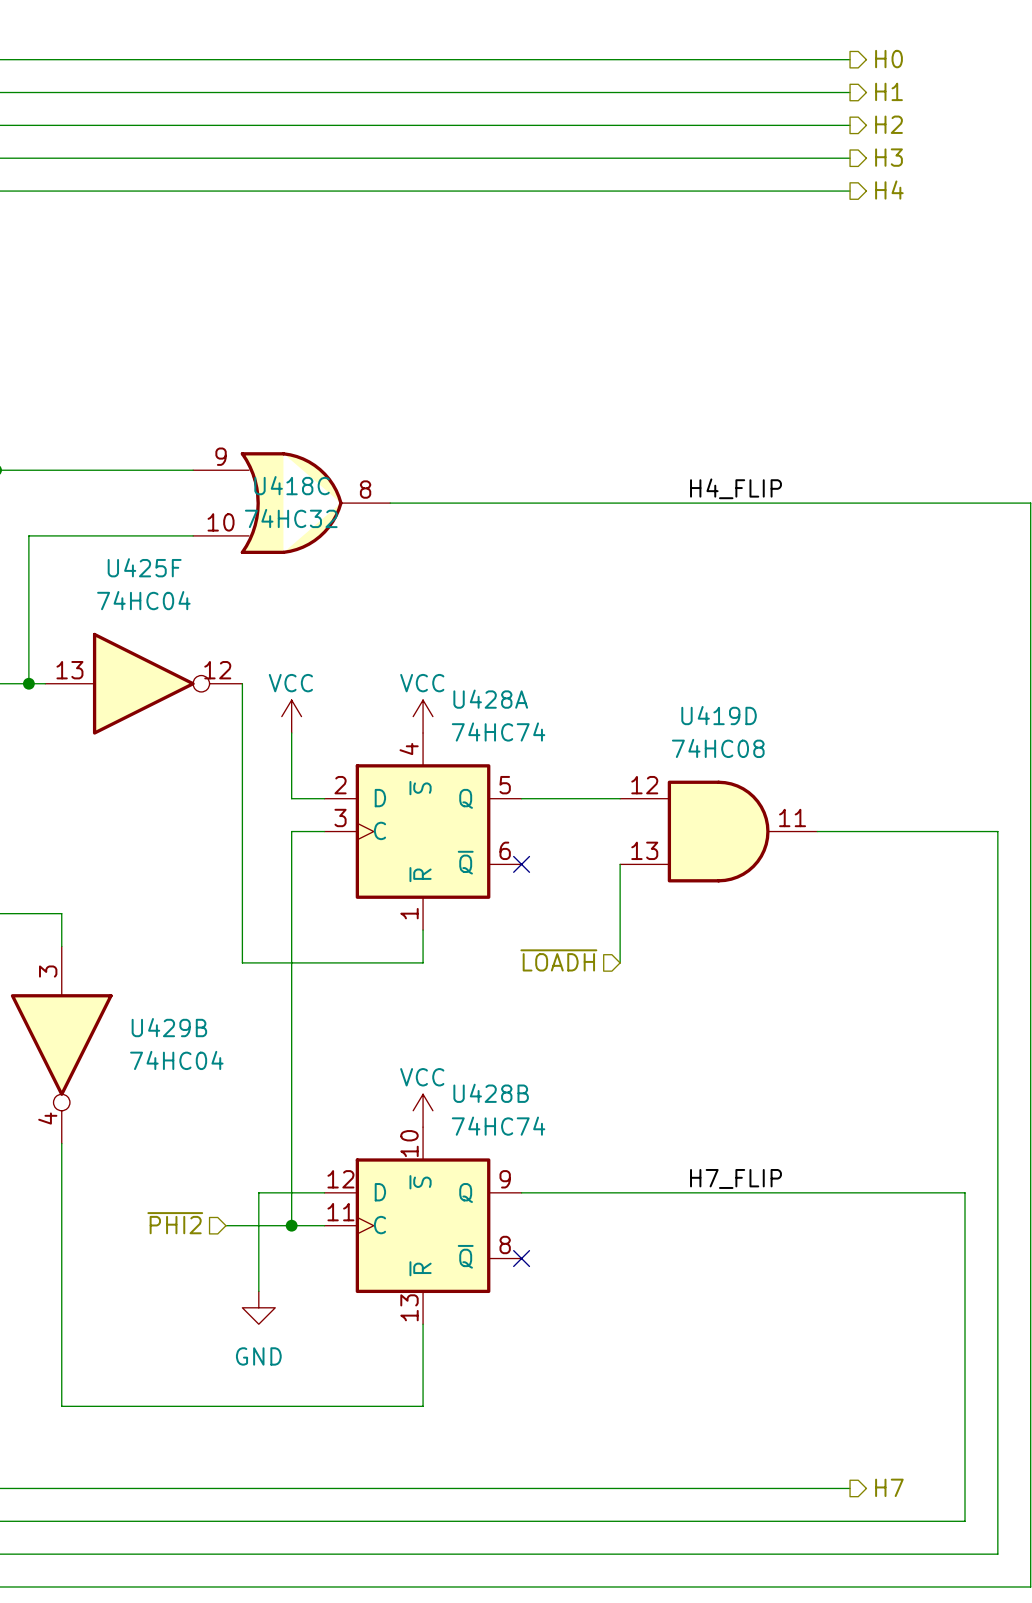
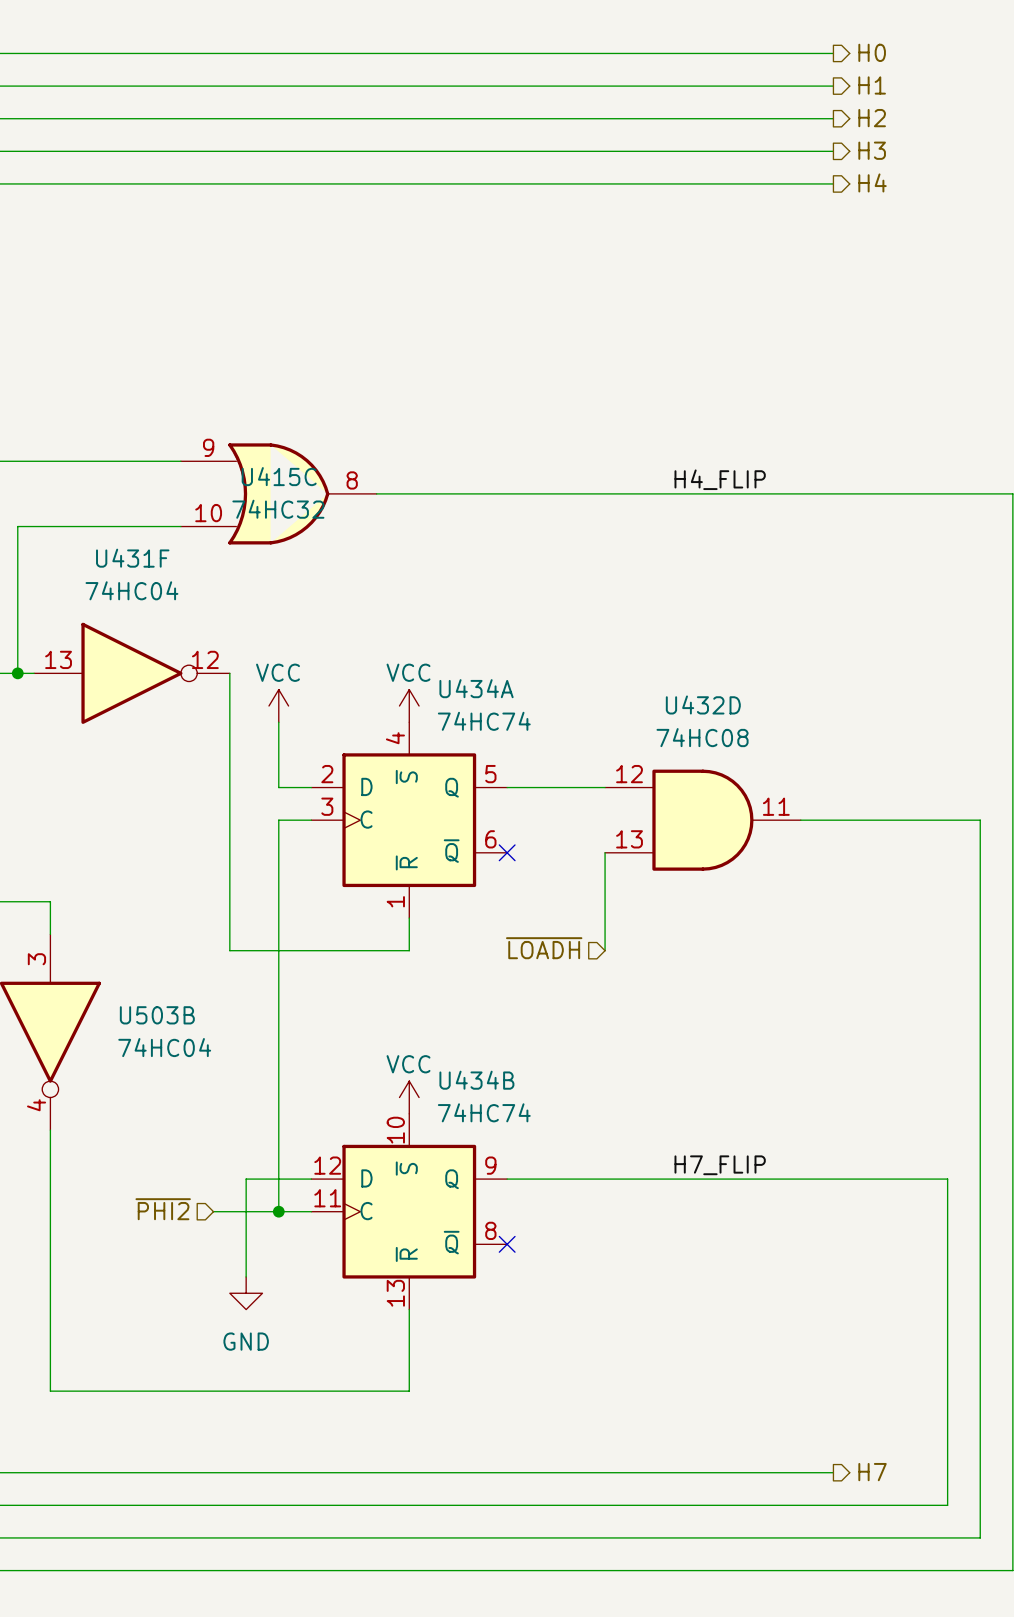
U418C name: U418C (292, 485) -> U415C (279, 476)
U425F name: U425F (144, 567) -> U431F (132, 558)
U428A name: U428A (490, 699) -> U434A (476, 688)
U419D name: U419D (719, 715) -> U432D (703, 704)
U429B name: U429B (169, 1027) -> U503B (157, 1015)
U428B name: U428B (491, 1093) -> U434B (476, 1080)

